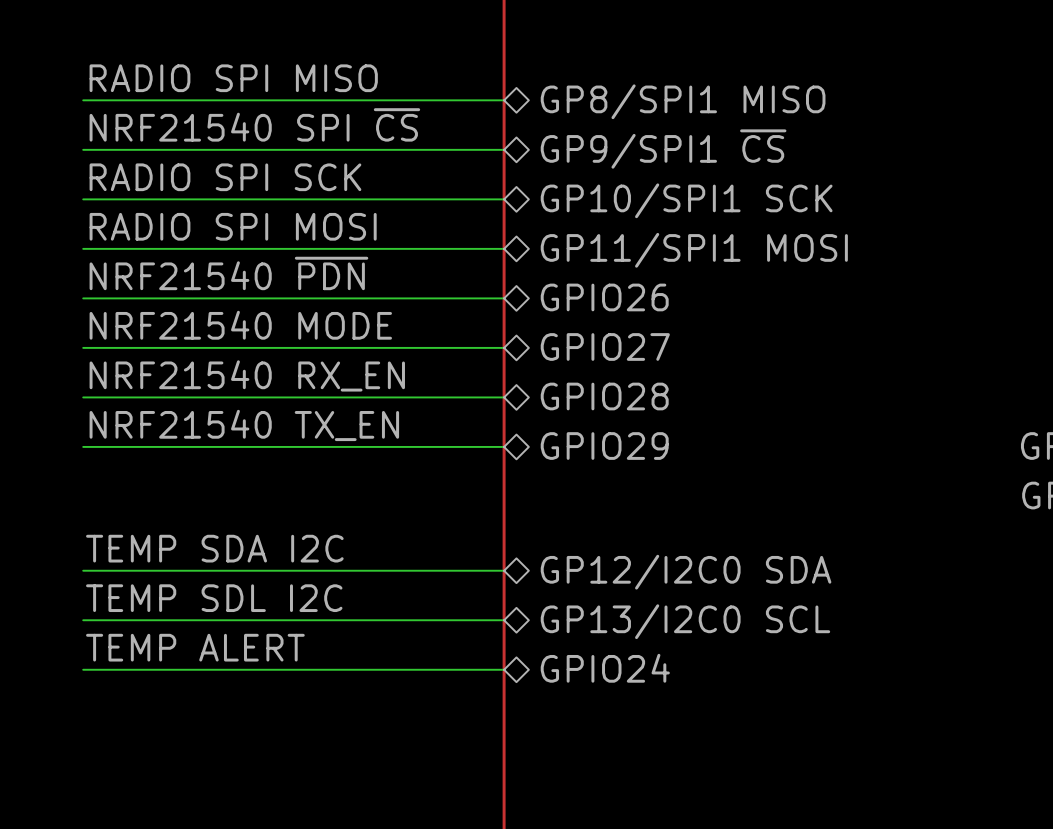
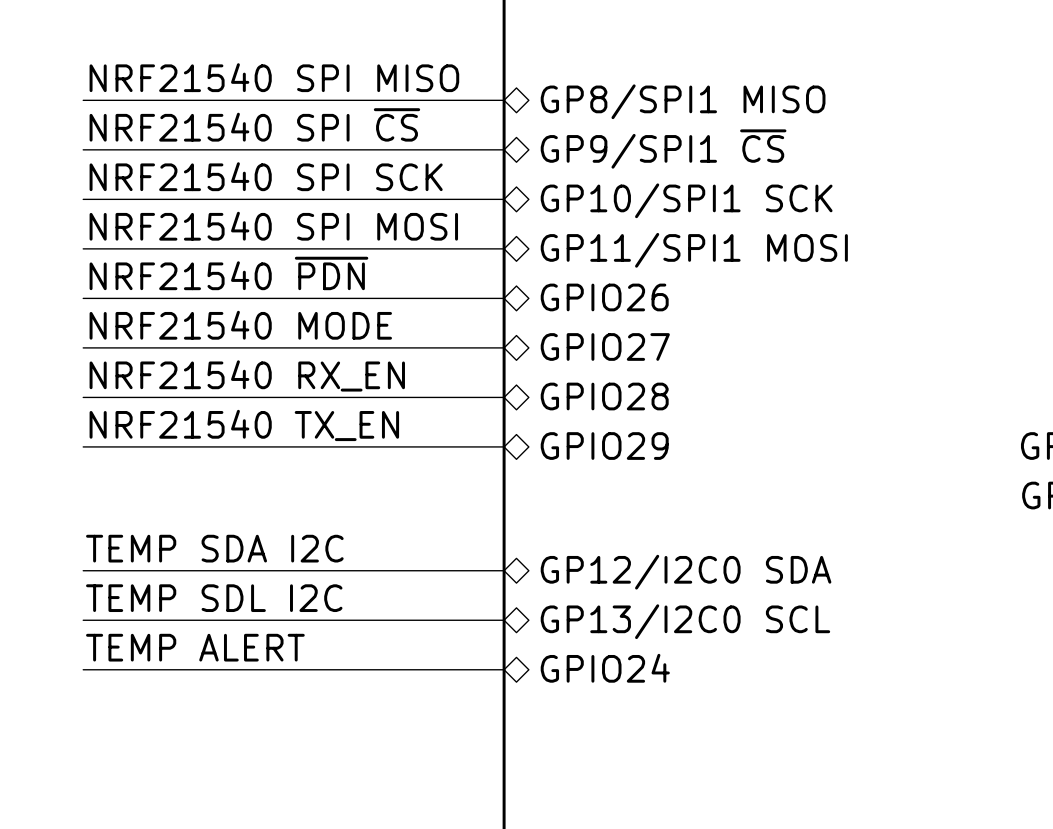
label: RADIO SPI MISO (233, 78) -> NRF21540 SPI MISO (274, 77)
label: RADIO SPI SCK (225, 177) -> NRF21540 SPI SCK (266, 176)
label: RADIO SPI MOSI (233, 226) -> NRF21540 SPI MOSI (273, 226)

